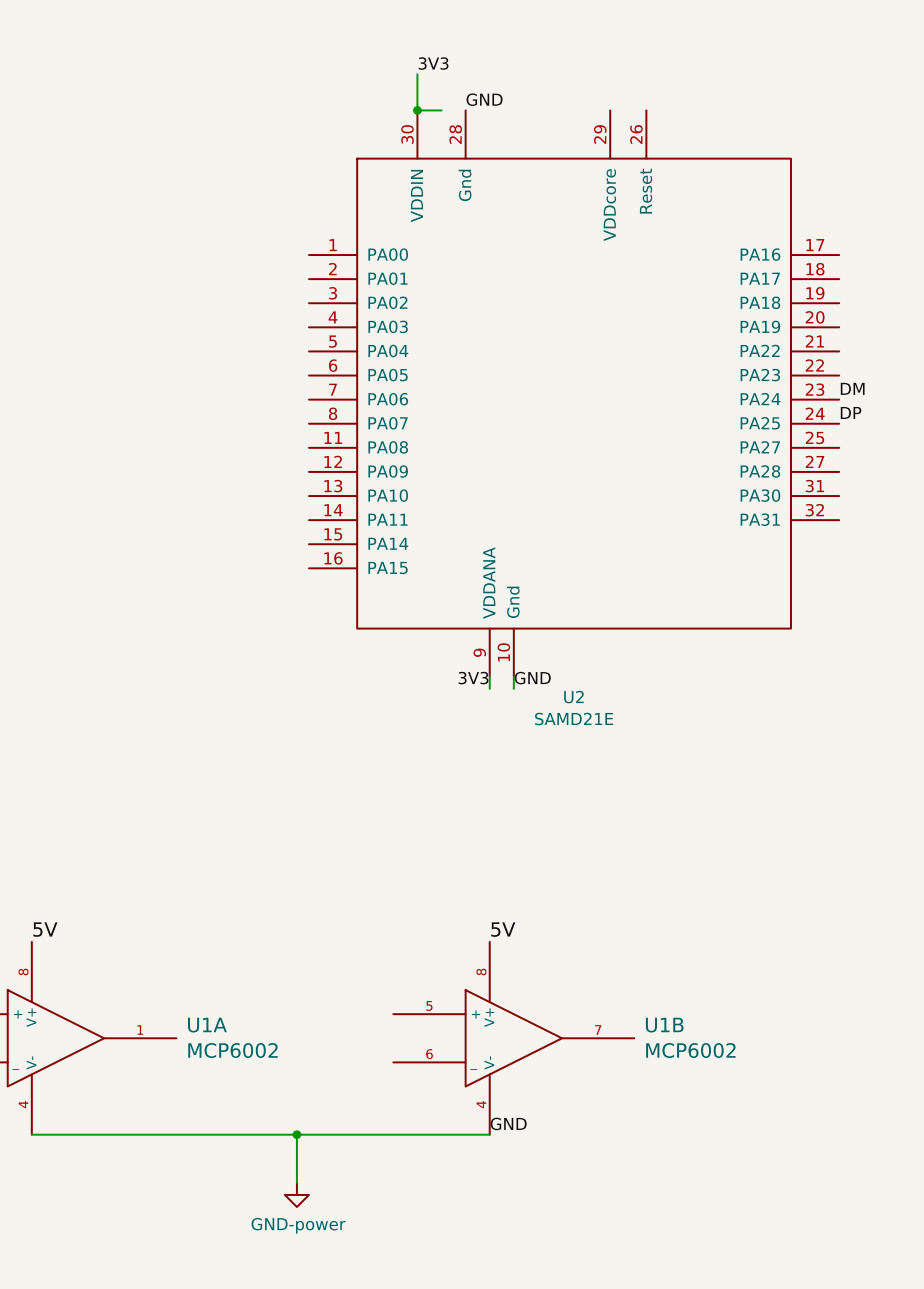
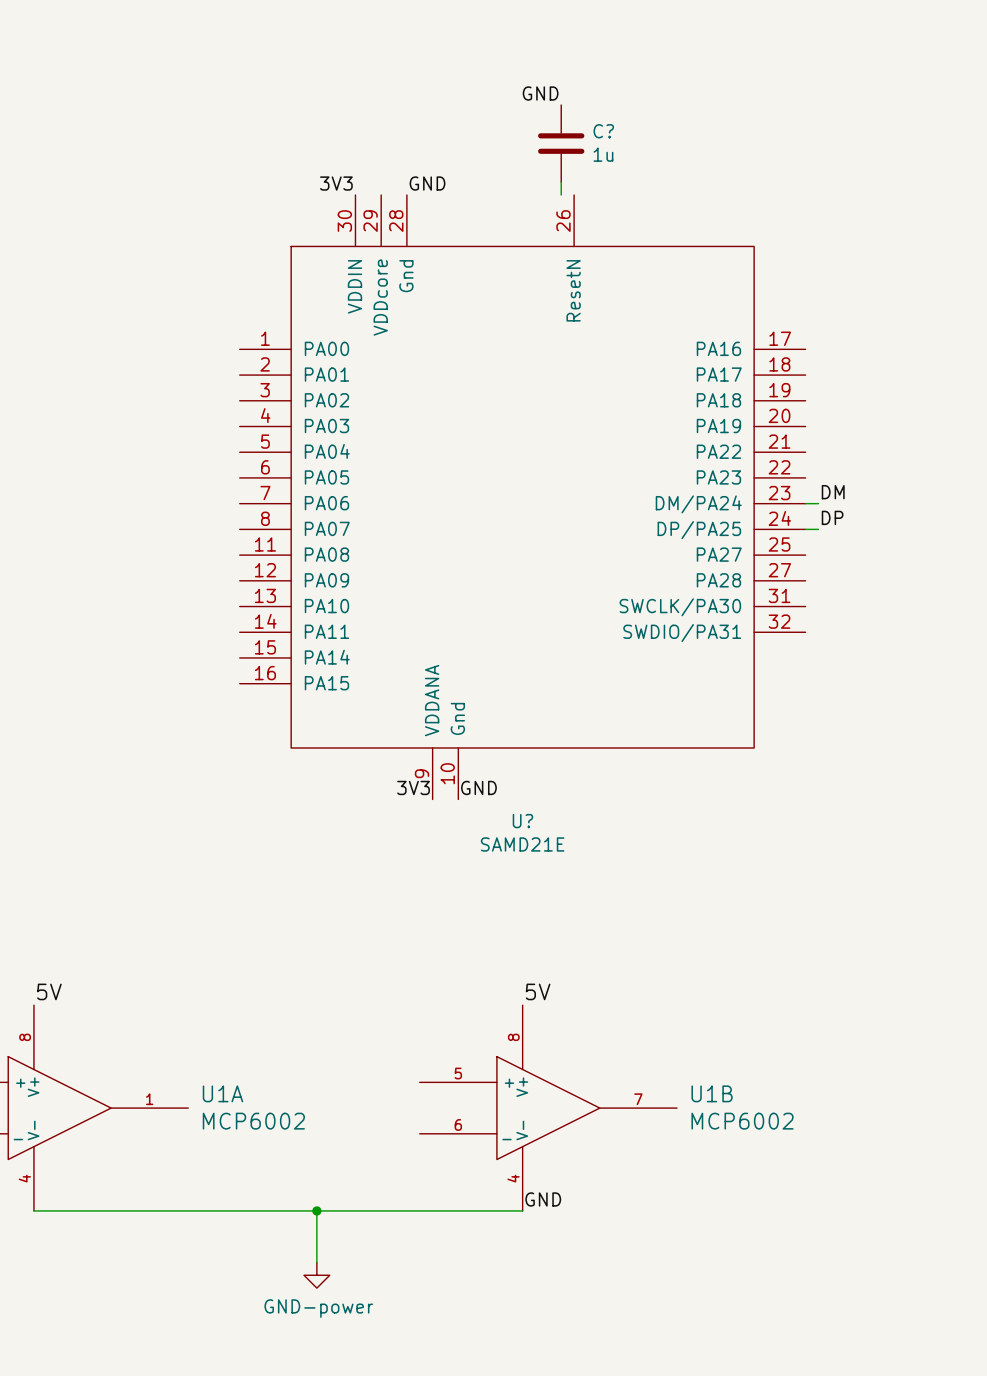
label position: 3V3 (433, 63) -> 3V3 (336, 183)
wire: (417, 74) (417, 110) (441, 110) -> none
label position: GND (484, 99) -> GND (540, 93)
junction: (417, 110) -> none
C?: none -> 1u (561, 143)
wire: none -> (561, 182) (561, 195)
label: none -> GND (427, 183)
label position: DM (852, 388) -> DM (833, 492)
U2: SAMD21E (574, 393) -> none
label position: DP (851, 412) -> DP (832, 517)
U?: none -> SAMD21E (522, 497)
wire: none -> (805, 503) (818, 503)
wire: none -> (805, 529) (818, 529)
wire: (489, 676) (489, 688) -> none
wire: (513, 676) (513, 688) -> none
label position: 3V3 (473, 678) -> 3V3 (413, 787)
label position: GND (532, 678) -> GND (478, 787)

